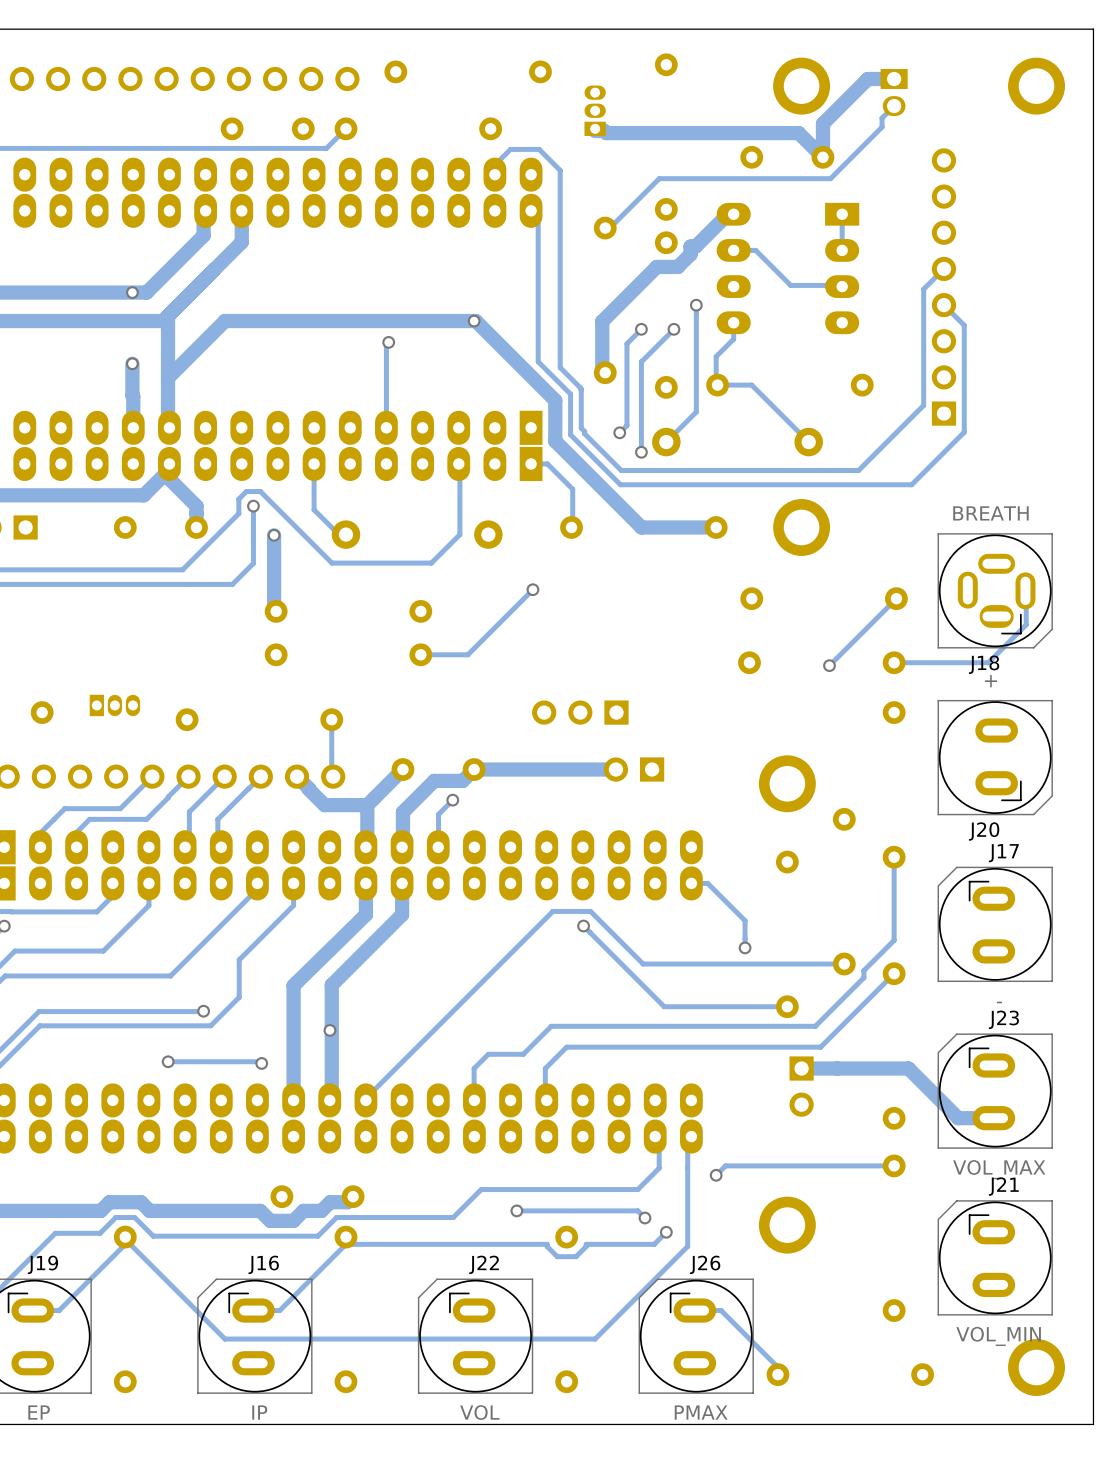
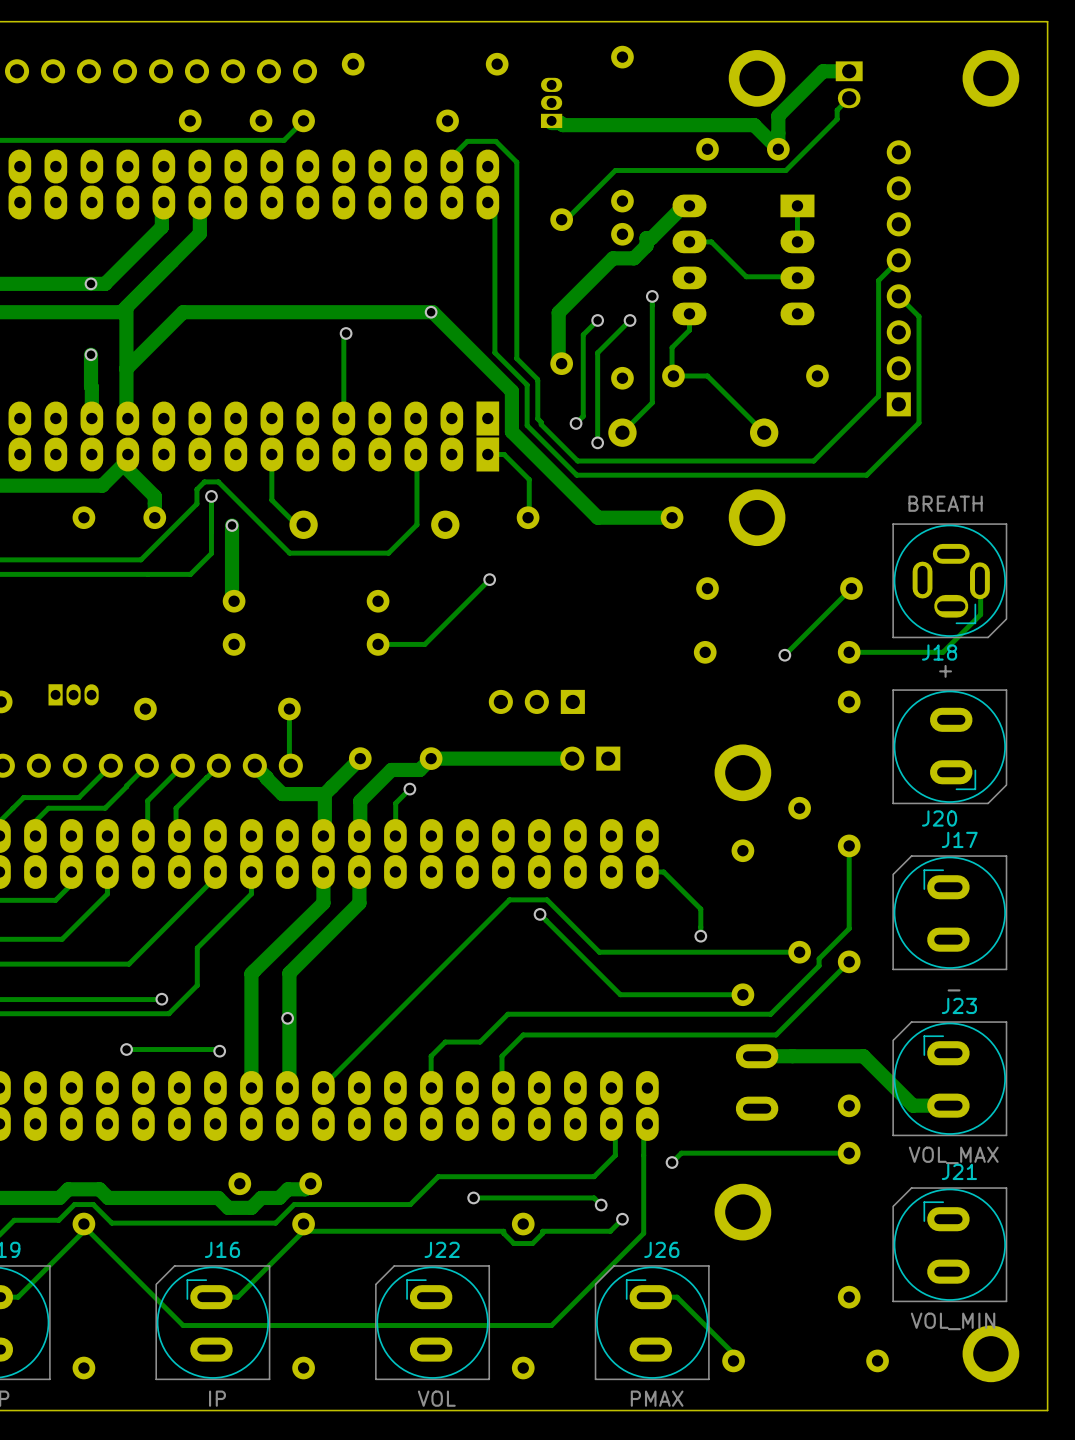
part footprint: [789, 1056, 814, 1117] -> [735, 1044, 779, 1121]

